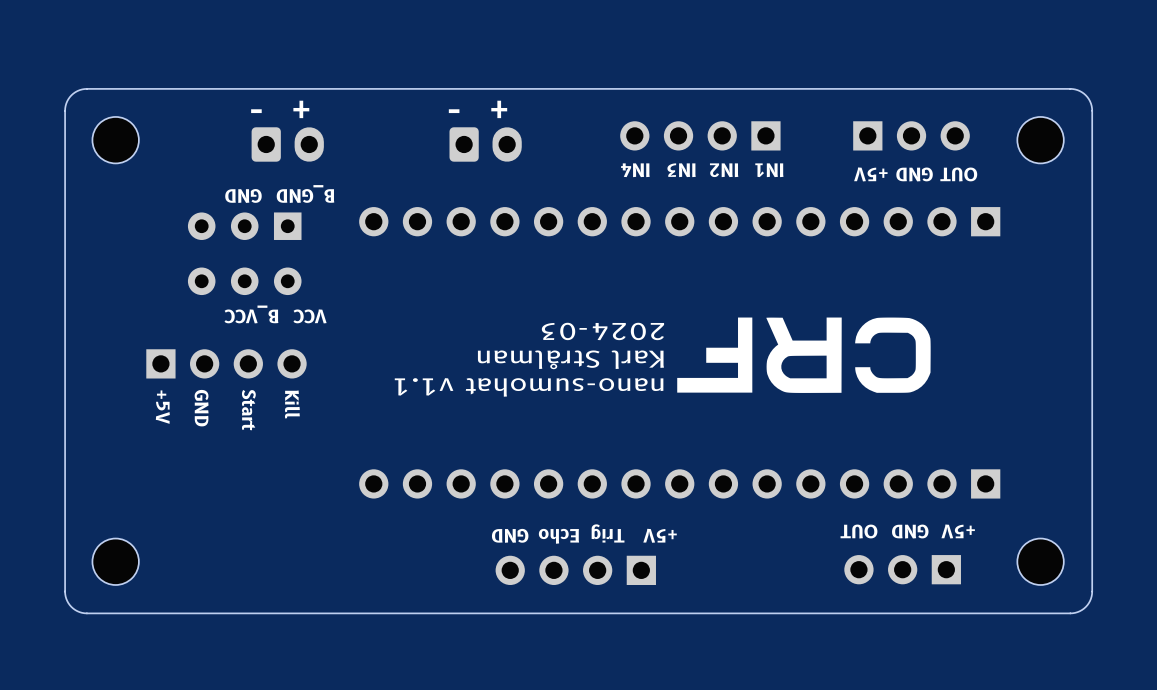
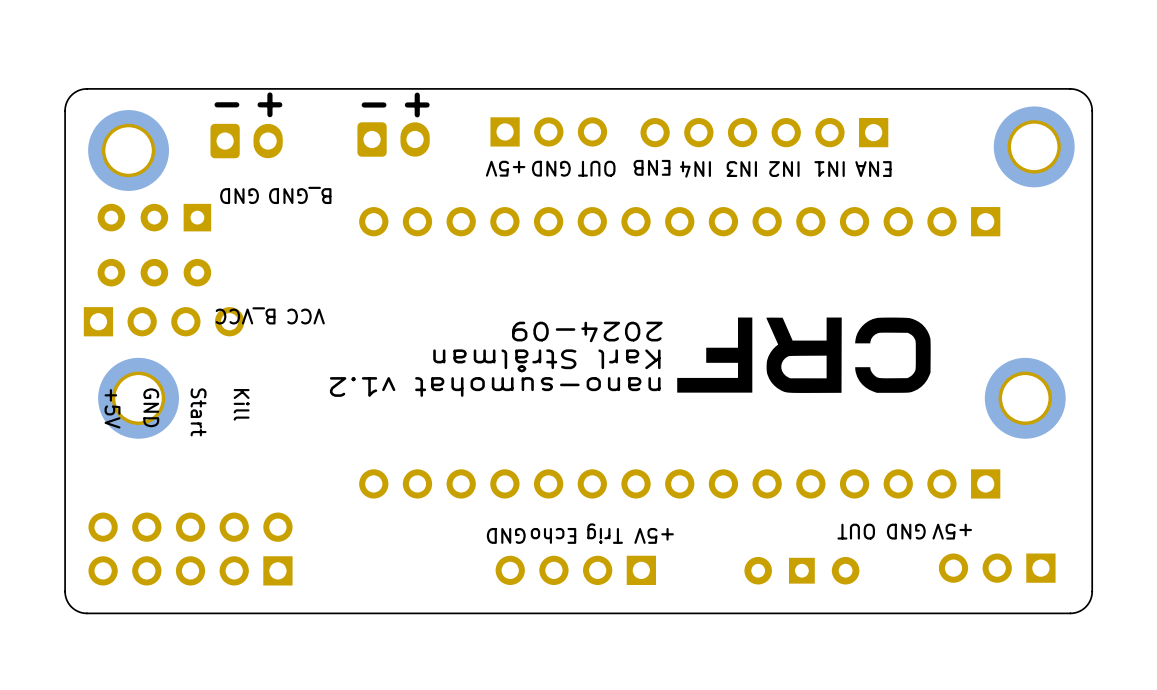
text: none -> + (417, 104)
text: none -> - (374, 104)
text position: + (301, 109) -> + (269, 104)
text: + (499, 109) -> none
text position: - (256, 111) -> - (226, 104)
text: - (454, 111) -> none
part footprint: [92, 116, 139, 164] -> [88, 110, 170, 191]
part footprint: [1017, 116, 1064, 164] -> [993, 106, 1075, 188]
part: none -> (548, 131)
part: none -> (764, 132)
part: (700, 135) -> none
part: (911, 135) -> none
part: none -> (393, 139)
part position: (287, 144) -> (246, 141)
part: (485, 144) -> none
text: none -> ENB (651, 167)
text: none -> +5V (505, 168)
text: none -> GND (551, 168)
text position: IN4 (635, 170) -> IN4 (695, 169)
text position: IN3 (681, 170) -> IN3 (741, 169)
text position: IN2 (724, 170) -> IN2 (784, 169)
text position: IN1 (769, 170) -> IN1 (829, 169)
text: +5V (870, 174) -> ENA (873, 169)
text: GND (914, 174) -> none
text position: OUT (958, 174) -> OUT (596, 168)
part position: (244, 253) -> (154, 245)
text: 2024-03 (602, 331) -> 2024-09 (587, 331)
part position: (226, 363) -> (164, 321)
text: nano-sumohat v1.1 (529, 387) -> nano-sumohat v1.2 (495, 386)
part: none -> (138, 398)
part: none -> (1025, 398)
text position: Kill (292, 404) -> Kill (241, 404)
text position: +5V (162, 407) -> +5V (112, 408)
text position: GND (201, 408) -> GND (151, 407)
text position: Start (248, 410) -> Start (198, 412)
part: none -> (190, 549)
part: (115, 561) -> none
part: (1040, 561) -> none
part position: (902, 569) -> (997, 568)
part: none -> (801, 570)

